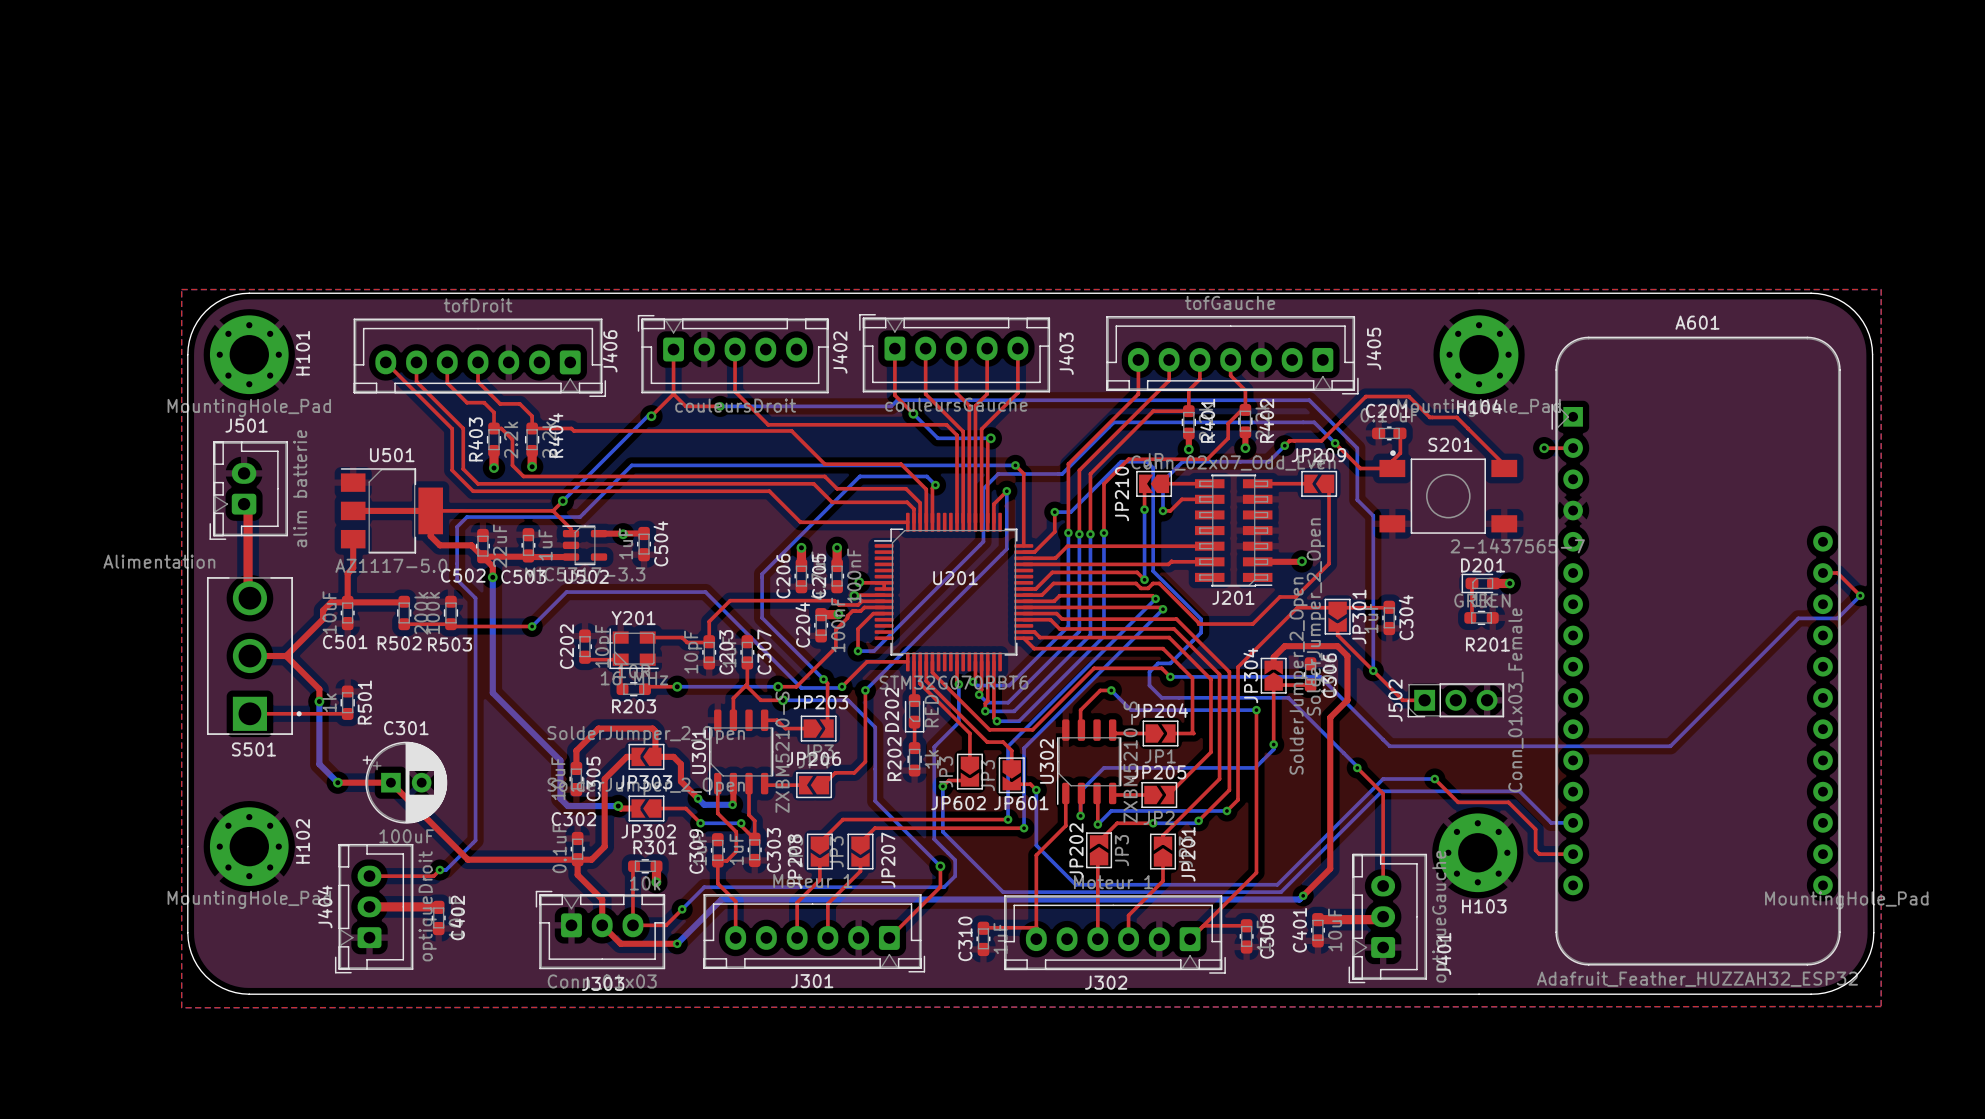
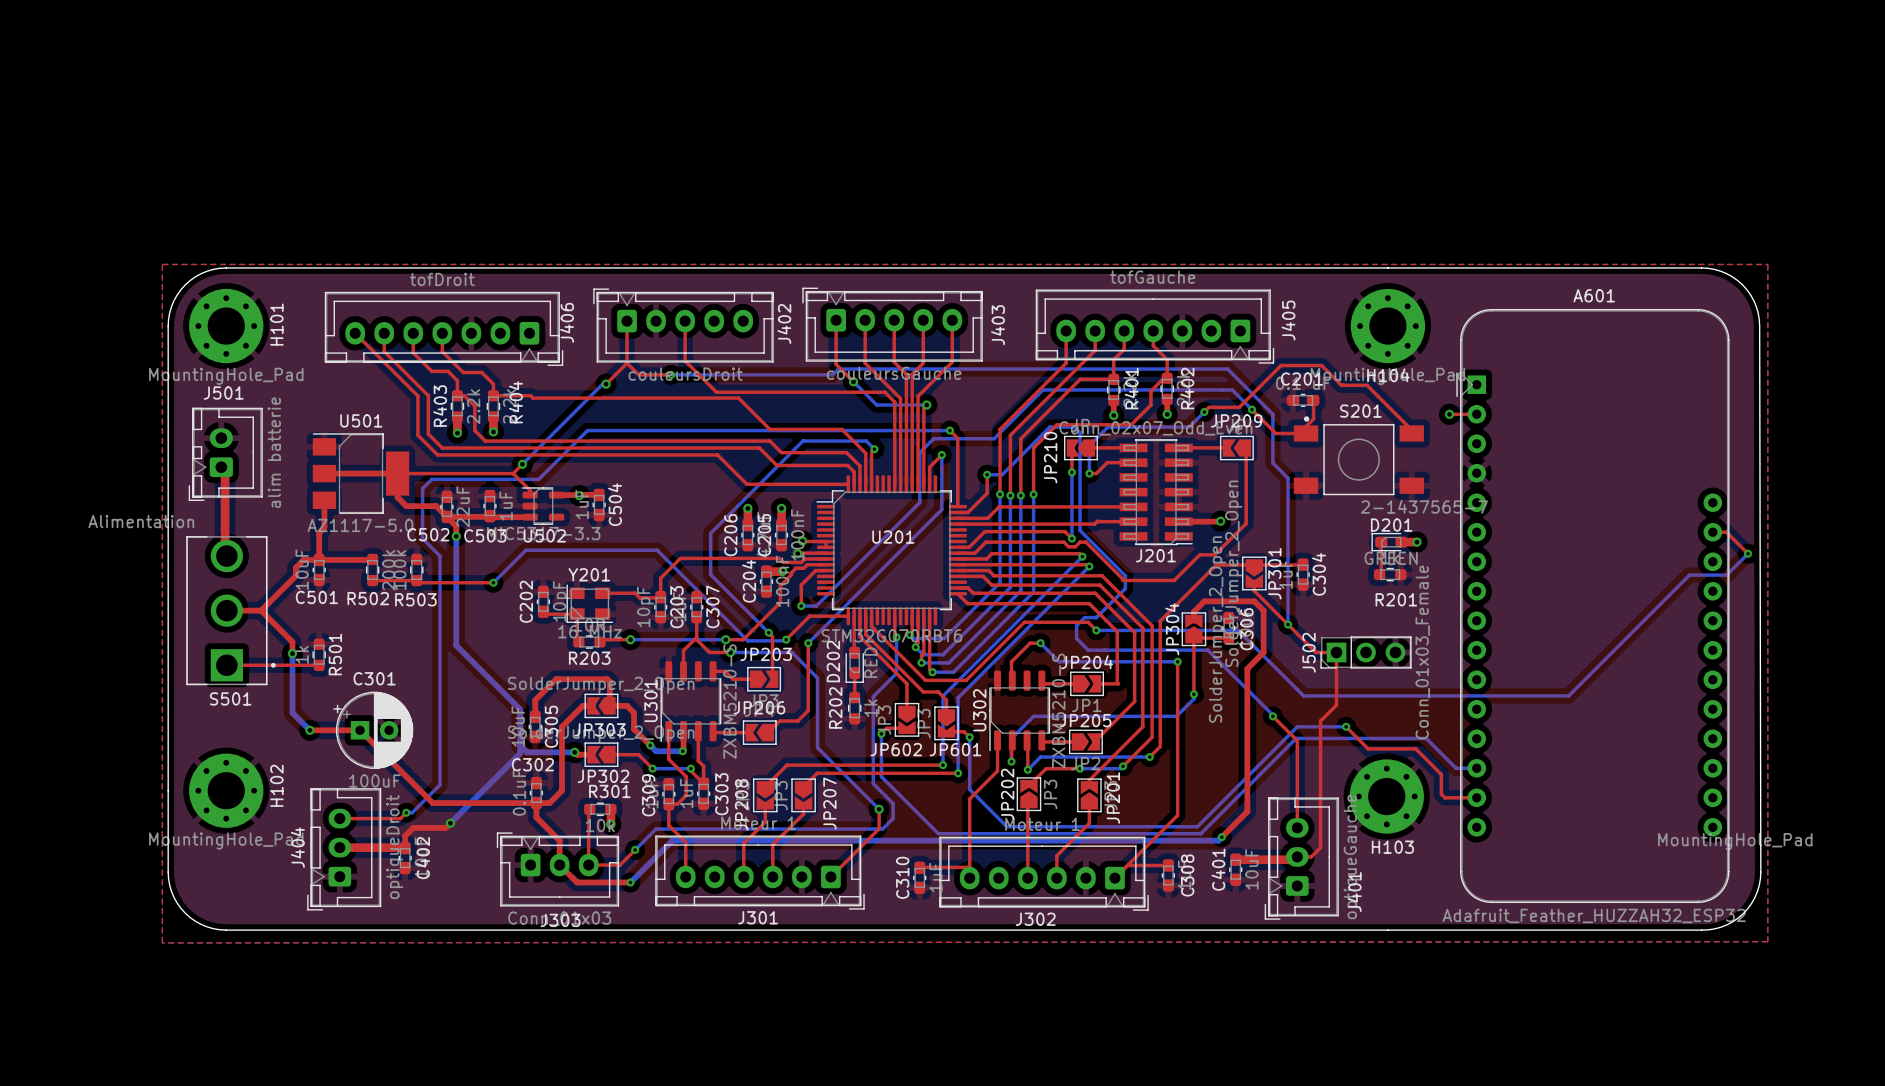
top track: none -> (1336, 652) (1336, 705) (1320, 721) (1320, 847) (1311, 856) (1297, 856)
bottom track: none -> (520, 745) (520, 753) (450, 823)
top track: none -> (450, 823) (445, 827) (413, 827) (405, 836) (405, 848)
via: none -> (450, 823)

